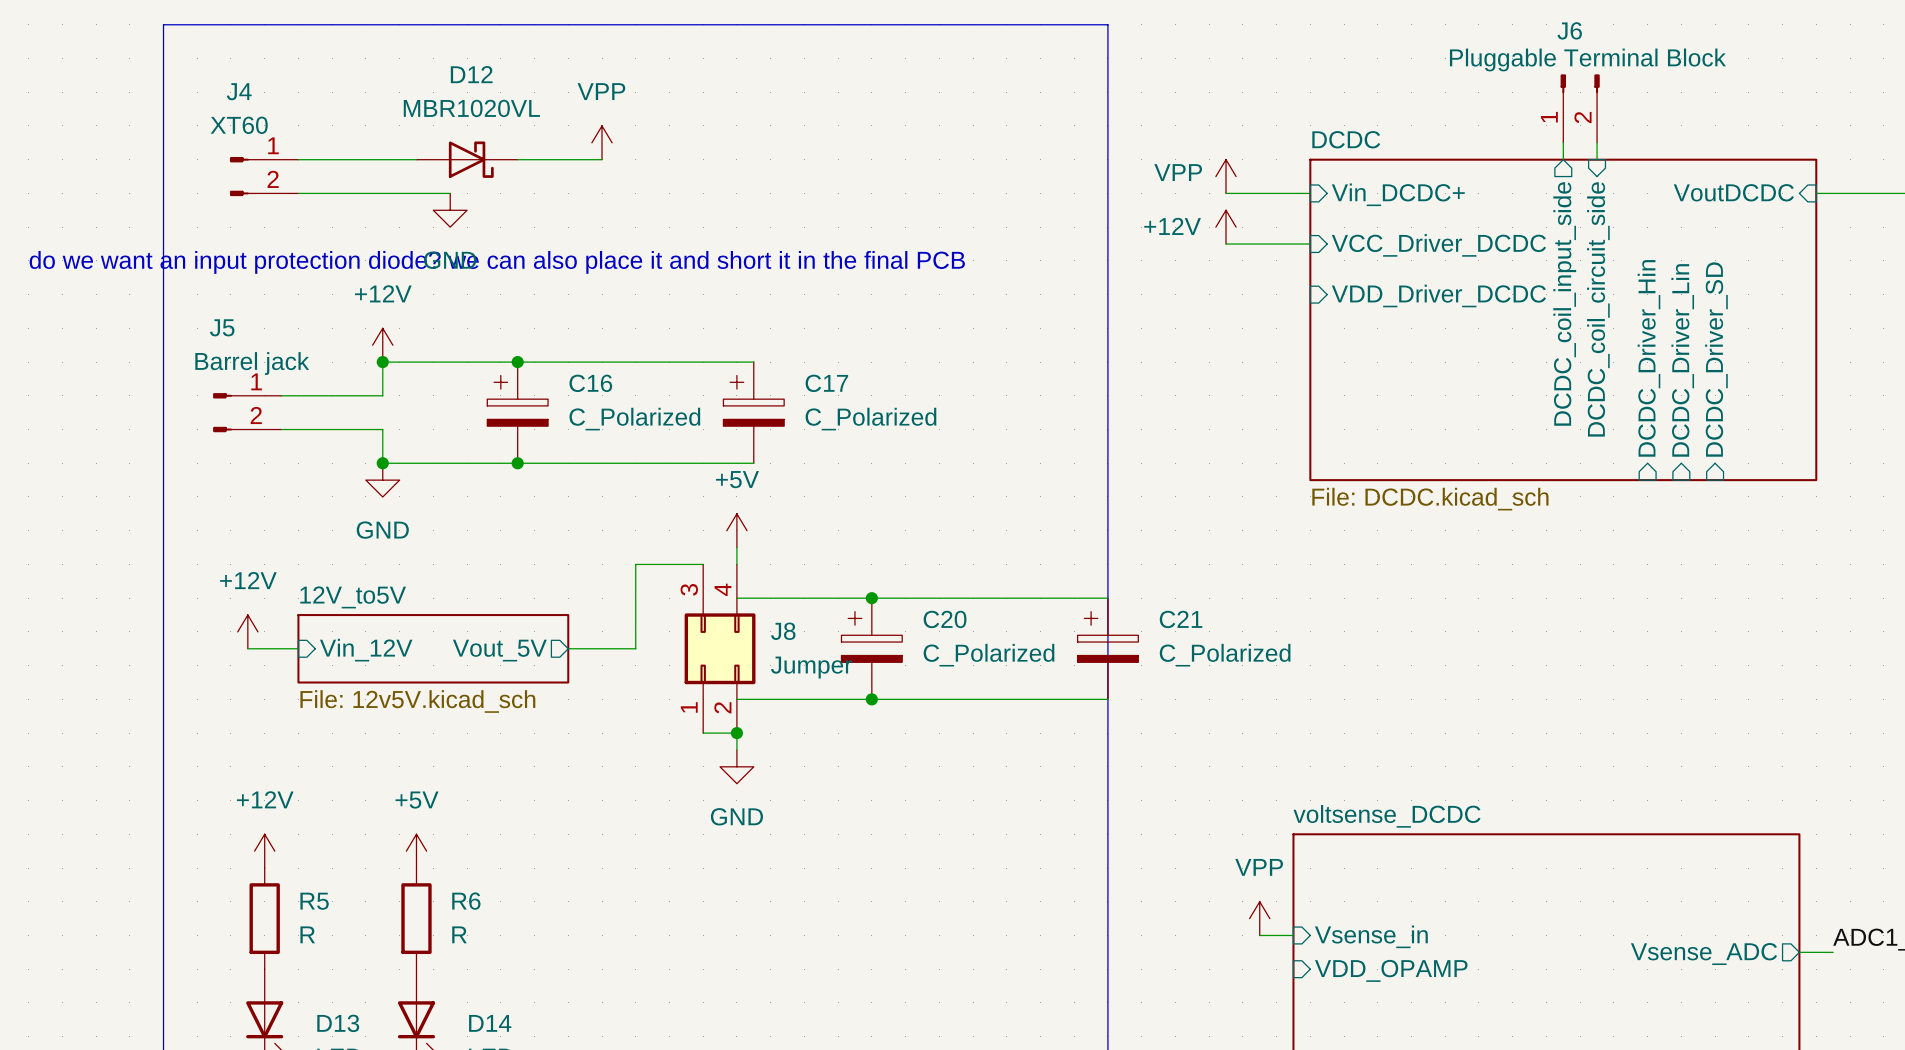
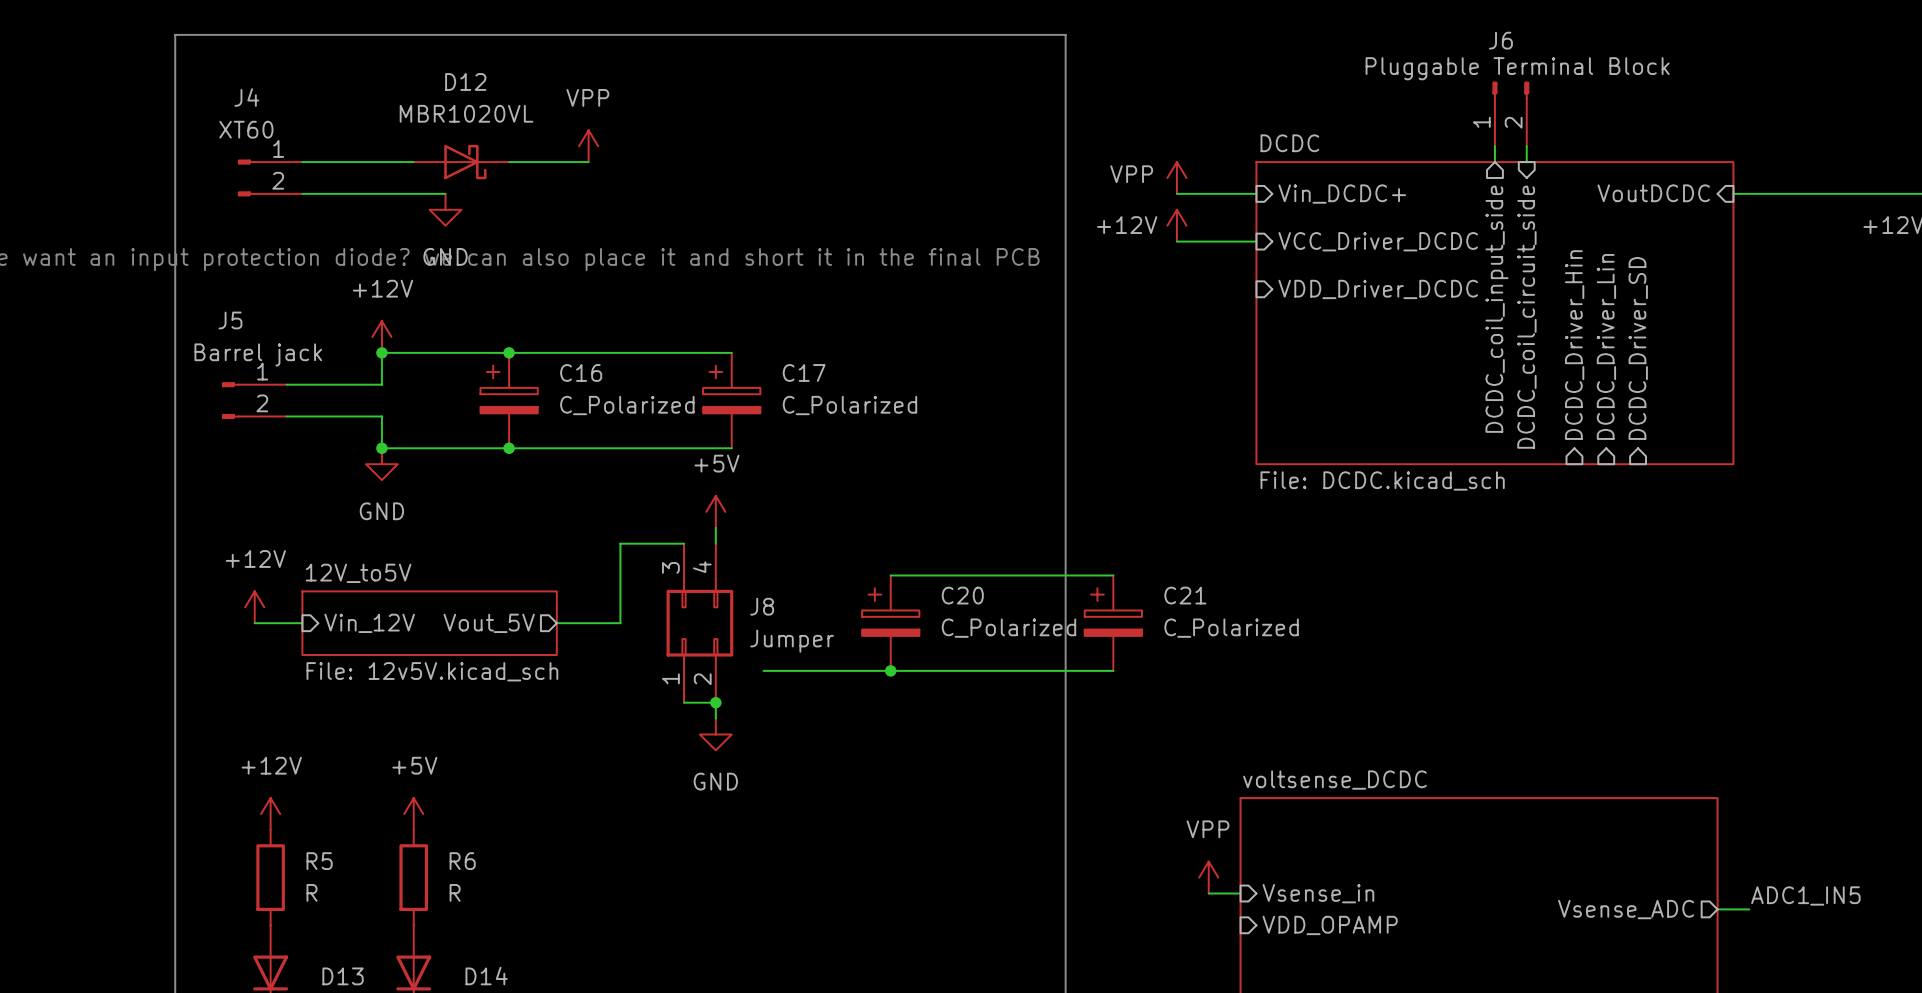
wire: (736, 598) (922, 598) -> none
junction: (871, 598) -> none
wire: none -> (1065, 575) (1113, 575)
C20 position: (871, 648) -> (890, 623)
C21 position: (1107, 648) -> (1113, 623)
wire: (736, 699) (787, 699) -> none
junction position: (871, 699) -> (890, 670)
wire: none -> (1065, 670) (1113, 670)

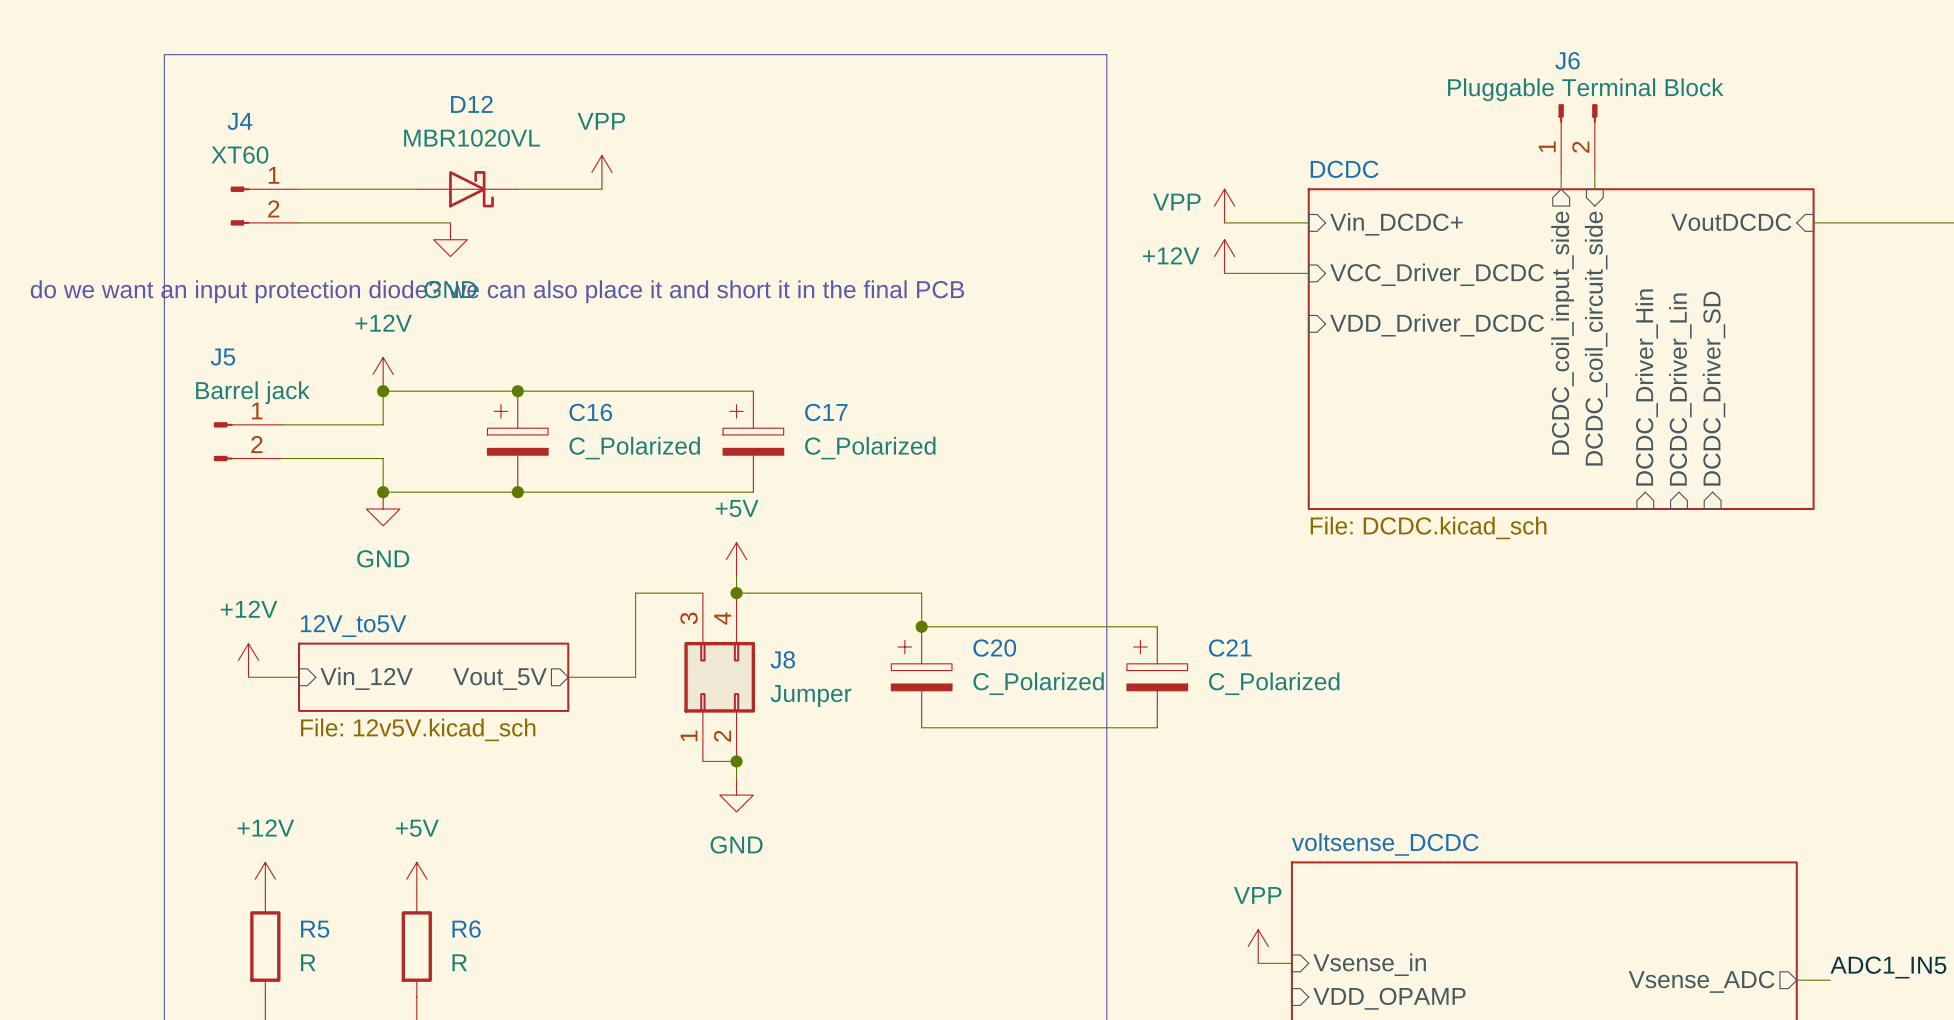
wire: none -> (736, 593) (921, 593) (921, 626)
junction: none -> (736, 593)
junction: none -> (921, 626)
wire: (763, 670) (890, 670) -> none
junction: (890, 670) -> none

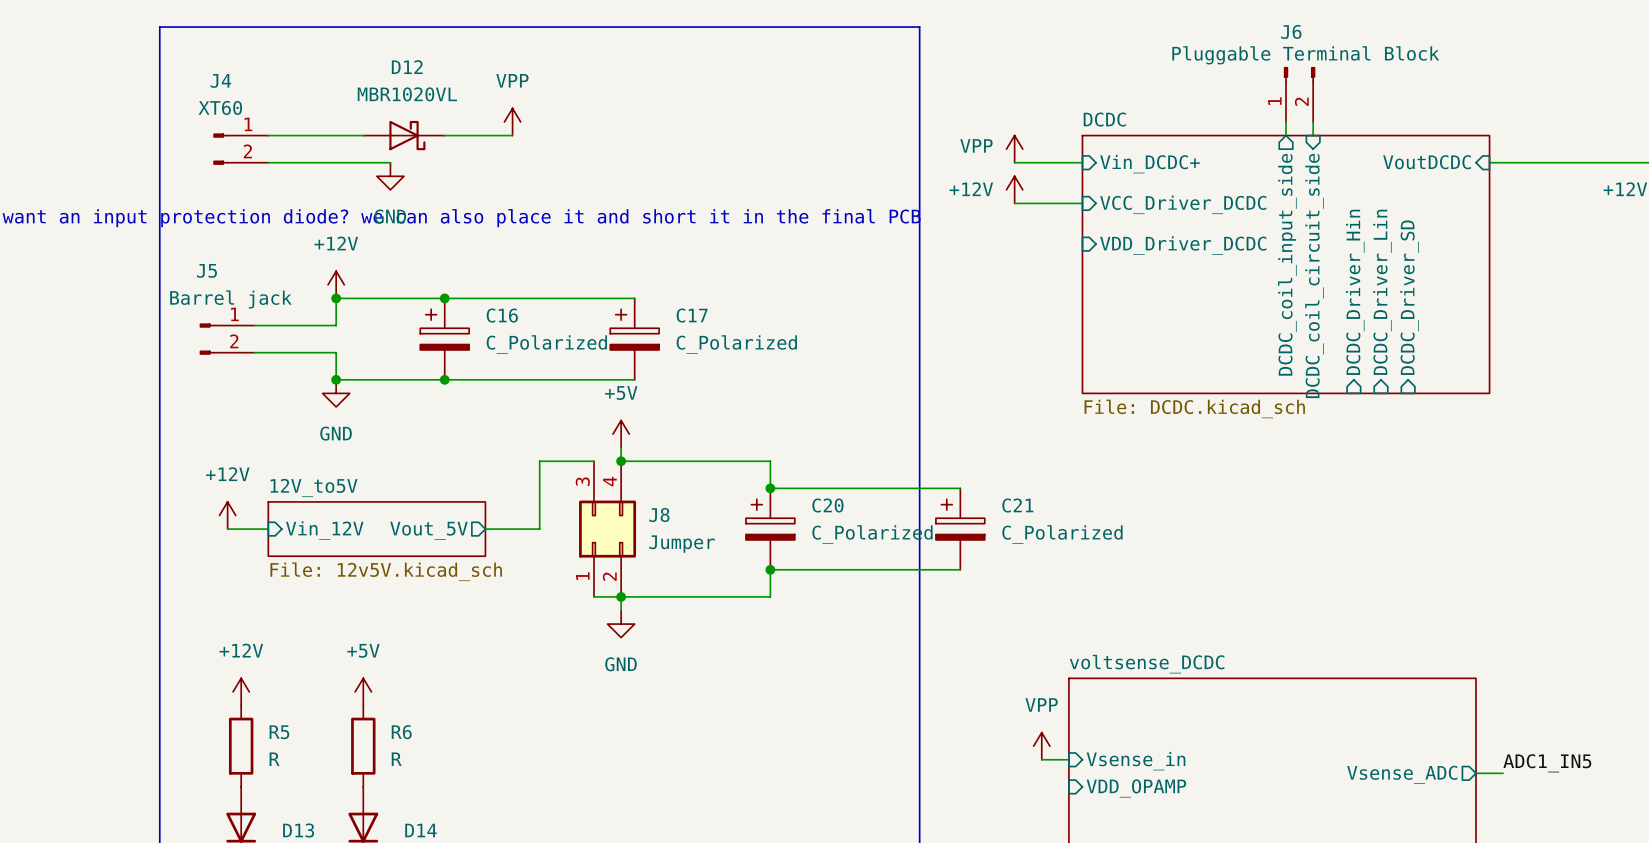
wire: none -> (770, 569) (770, 596) (621, 596)
junction: none -> (770, 569)

